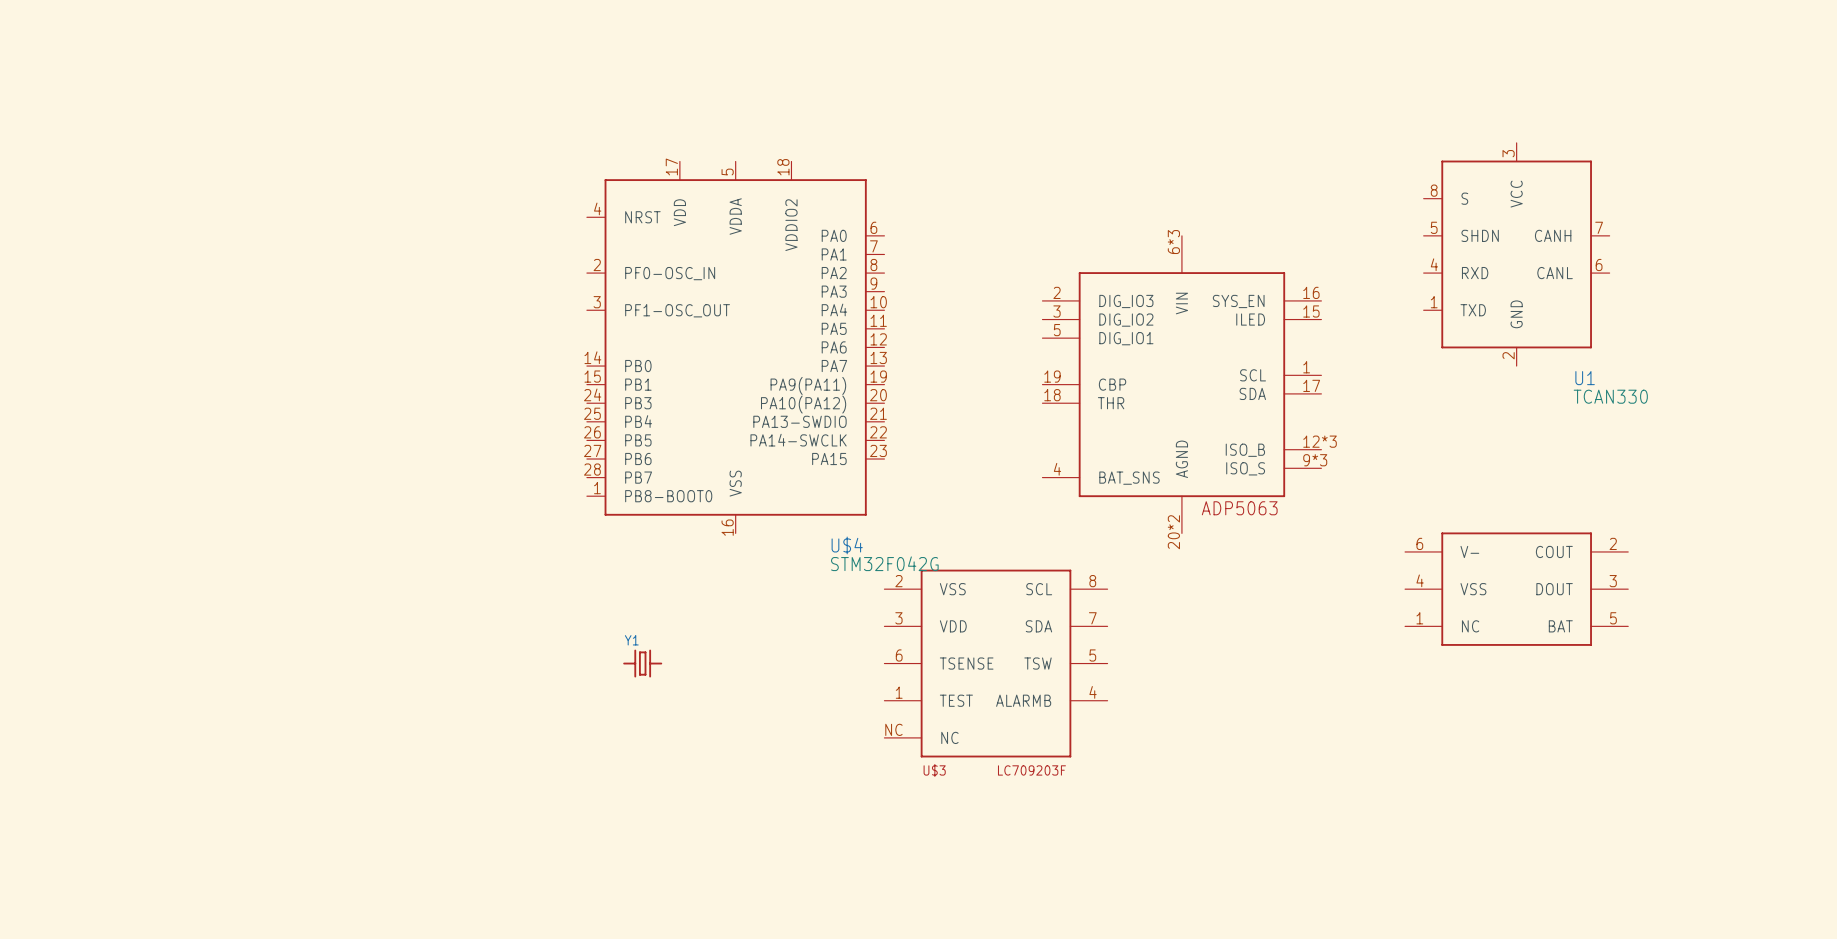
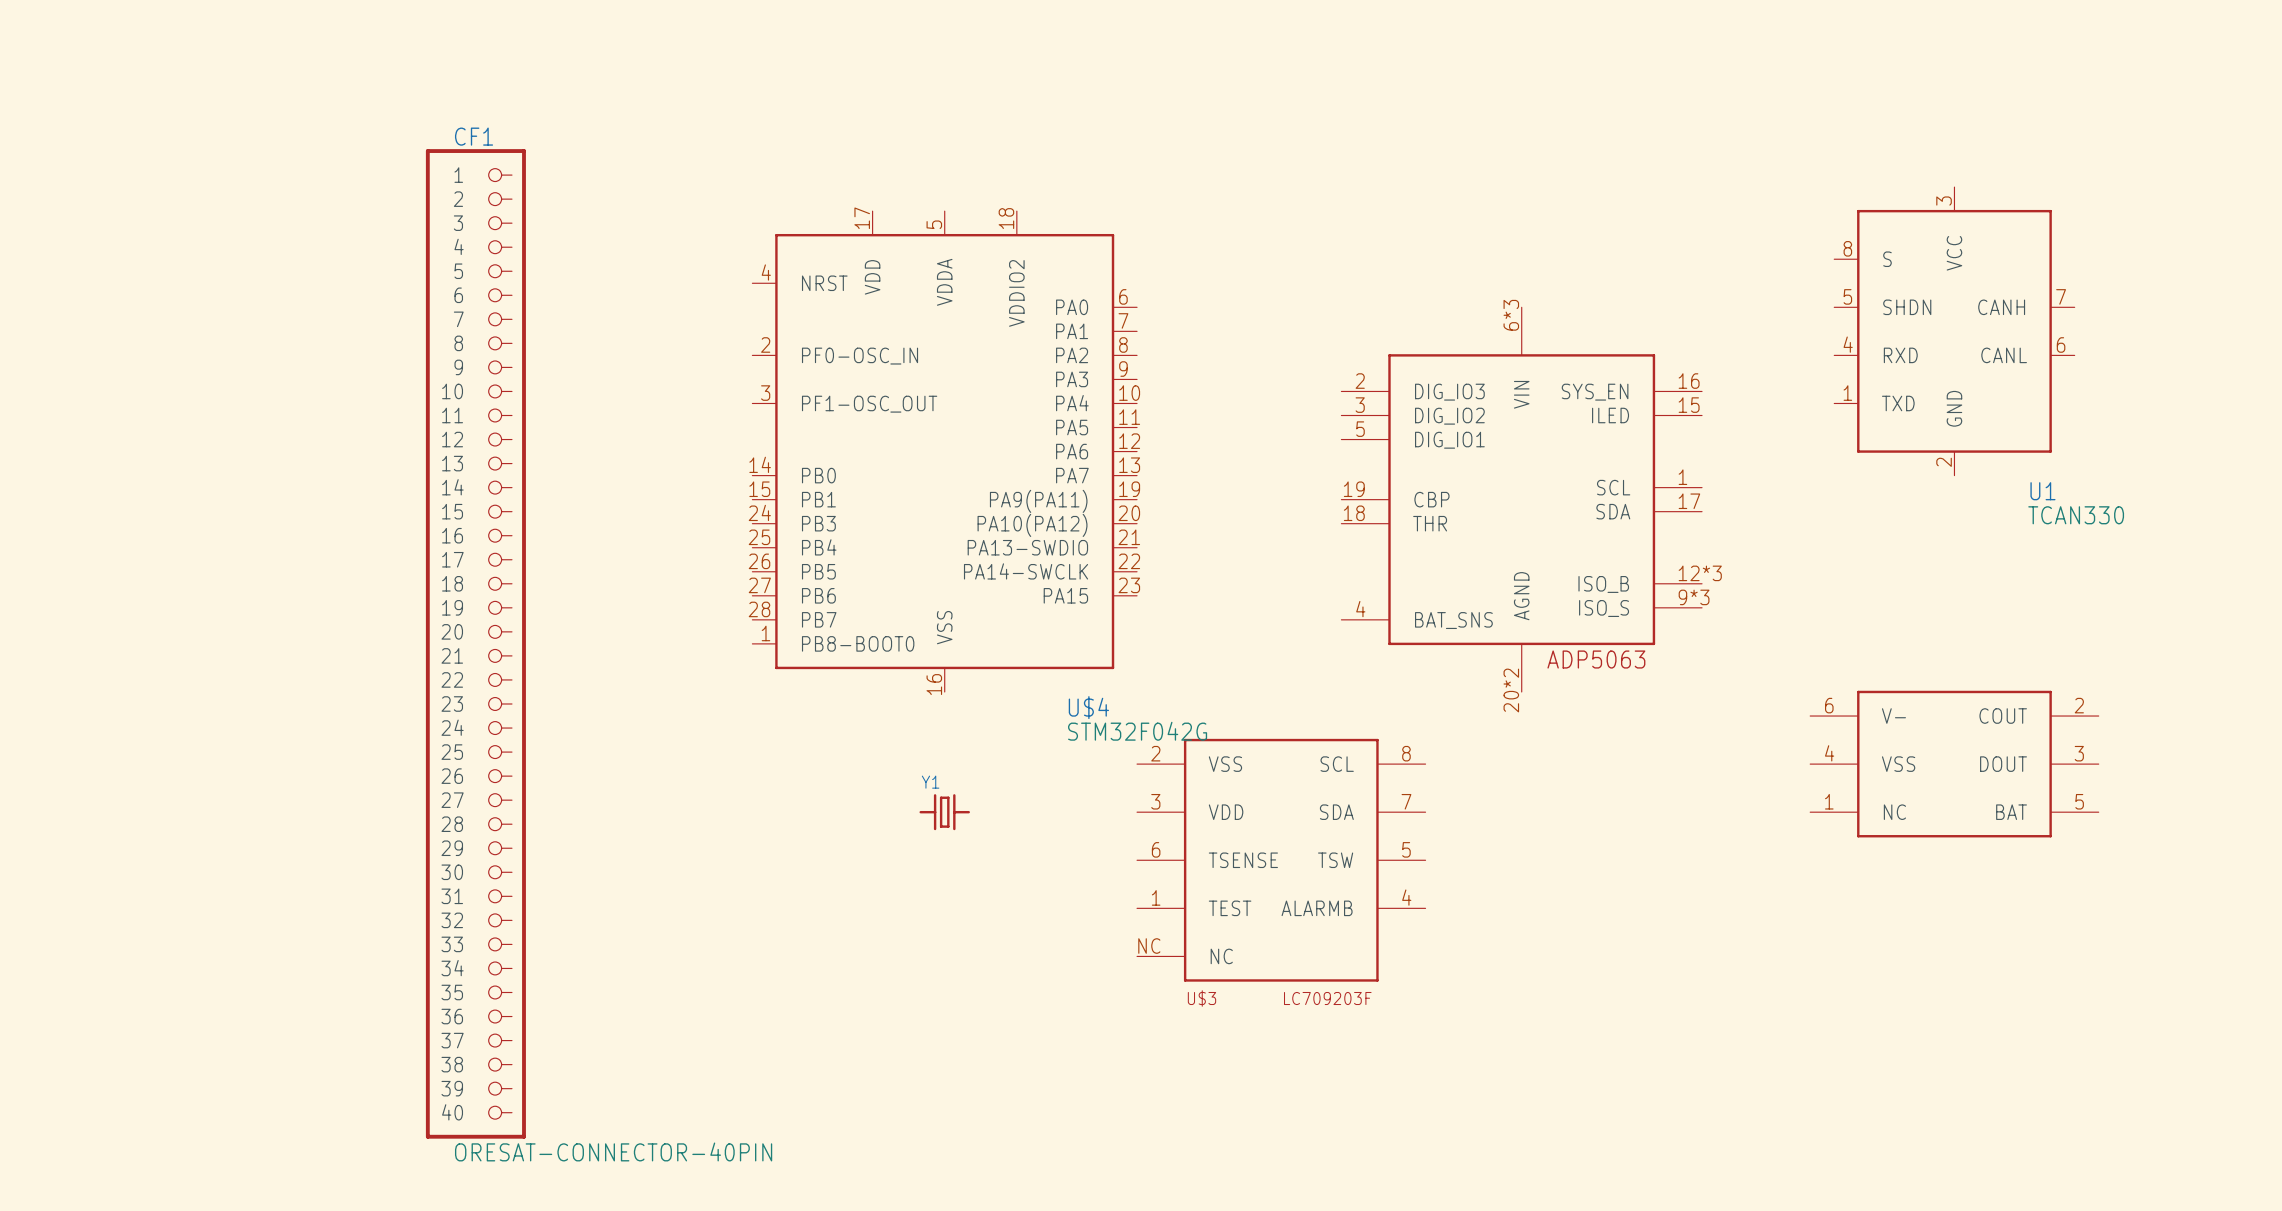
CF1: none -> ORESAT-CONNECTOR-40PIN (475, 643)
Y1 position: (642, 663) -> (944, 812)

